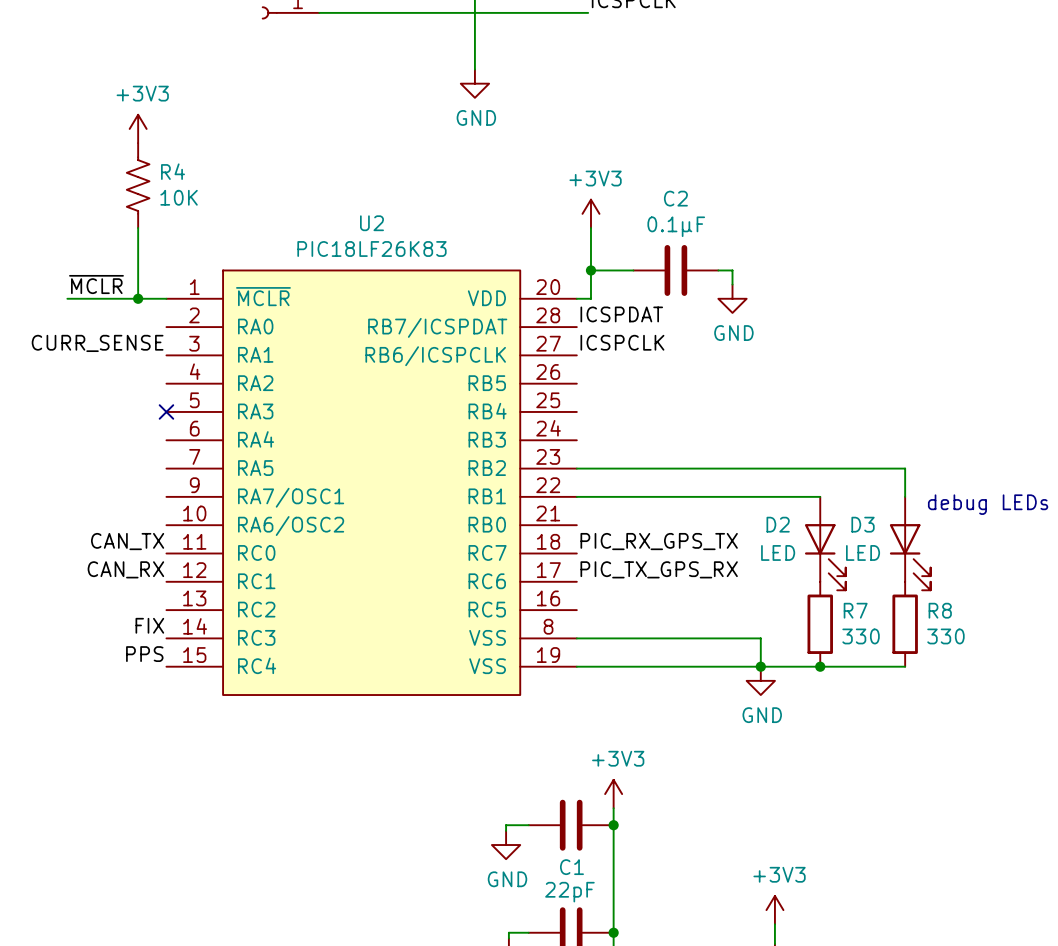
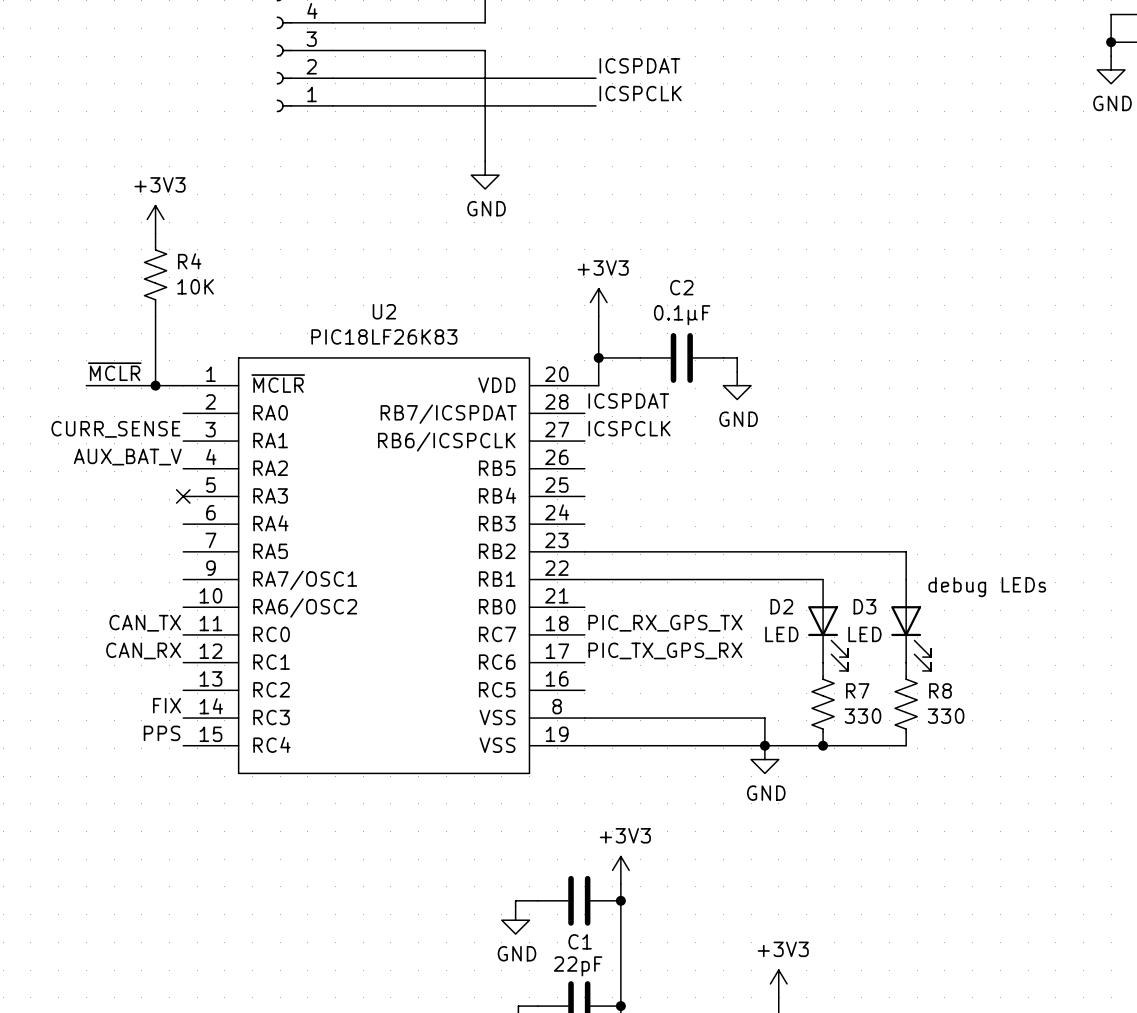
label: none -> AUX_BAT_V (127, 457)
R7 symbol: [807, 581, 833, 667] -> [811, 662, 835, 746]
R8 symbol: [892, 581, 918, 667] -> [895, 662, 918, 746]

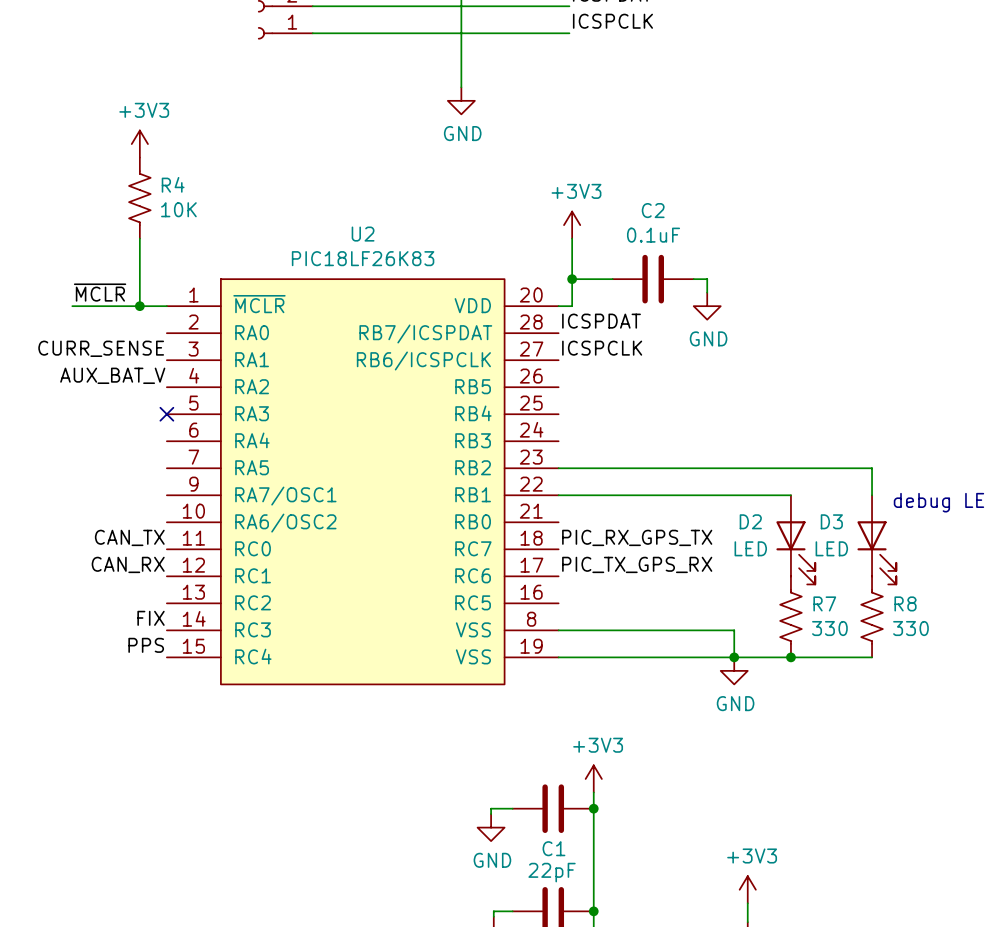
C2 value: 0.1µF (682, 315) -> 0.1uF (653, 235)

